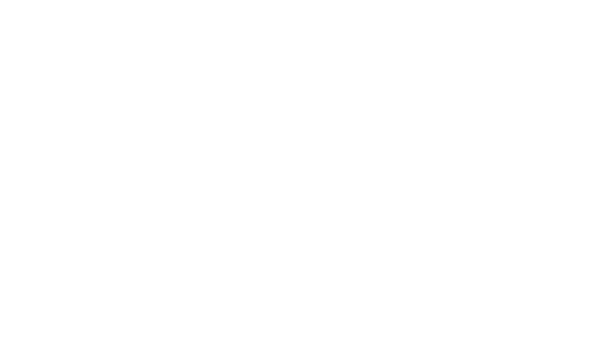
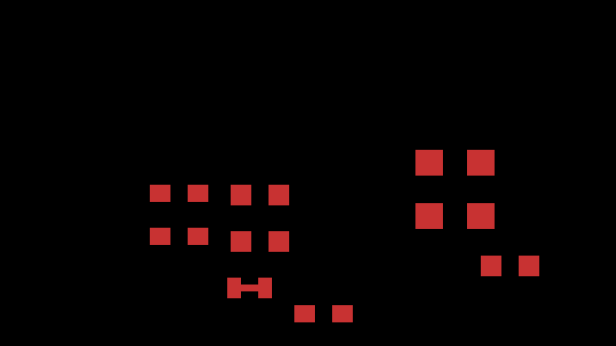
part: none -> (454, 162)
part: none -> (179, 193)
part: none -> (259, 195)
part: none -> (454, 216)
part: none -> (179, 236)
part: none -> (259, 241)
part: none -> (510, 265)
part: none -> (249, 287)
part: none -> (323, 313)

